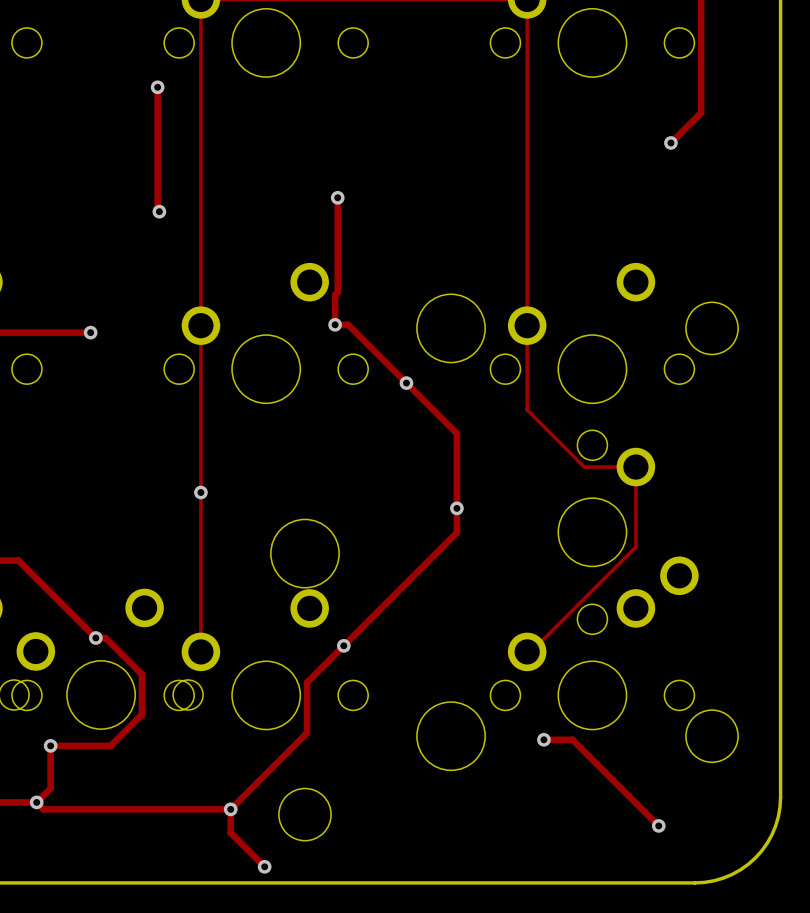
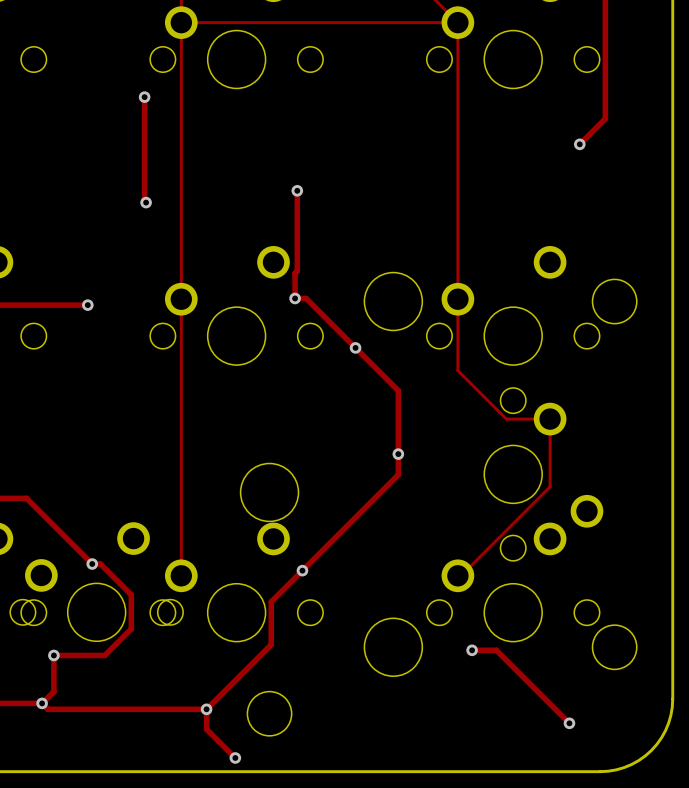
via: (200, 492) -> none

